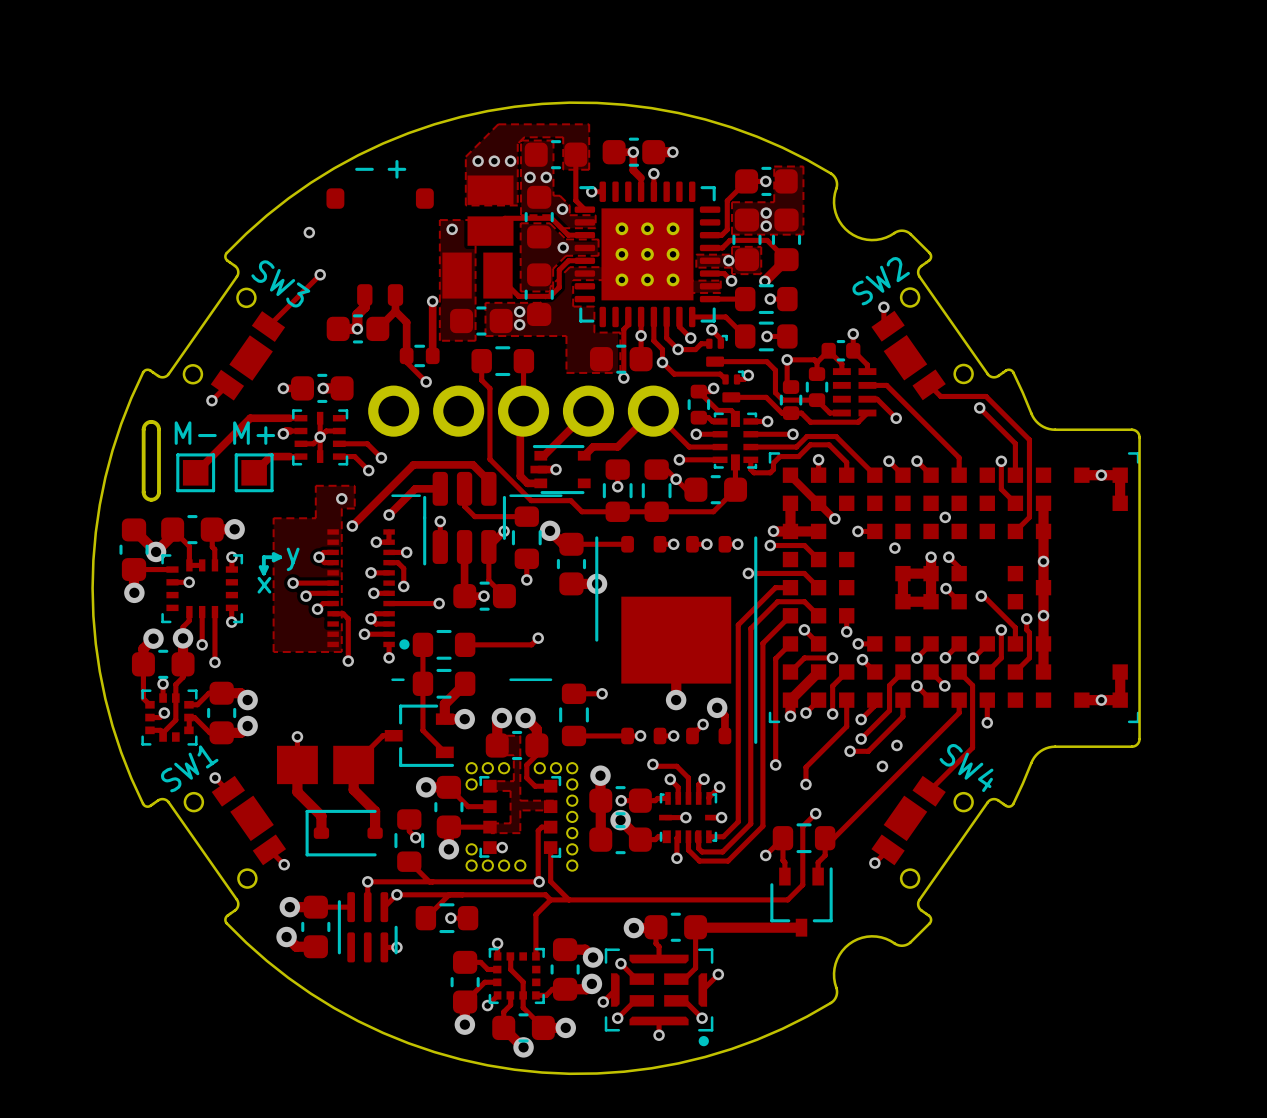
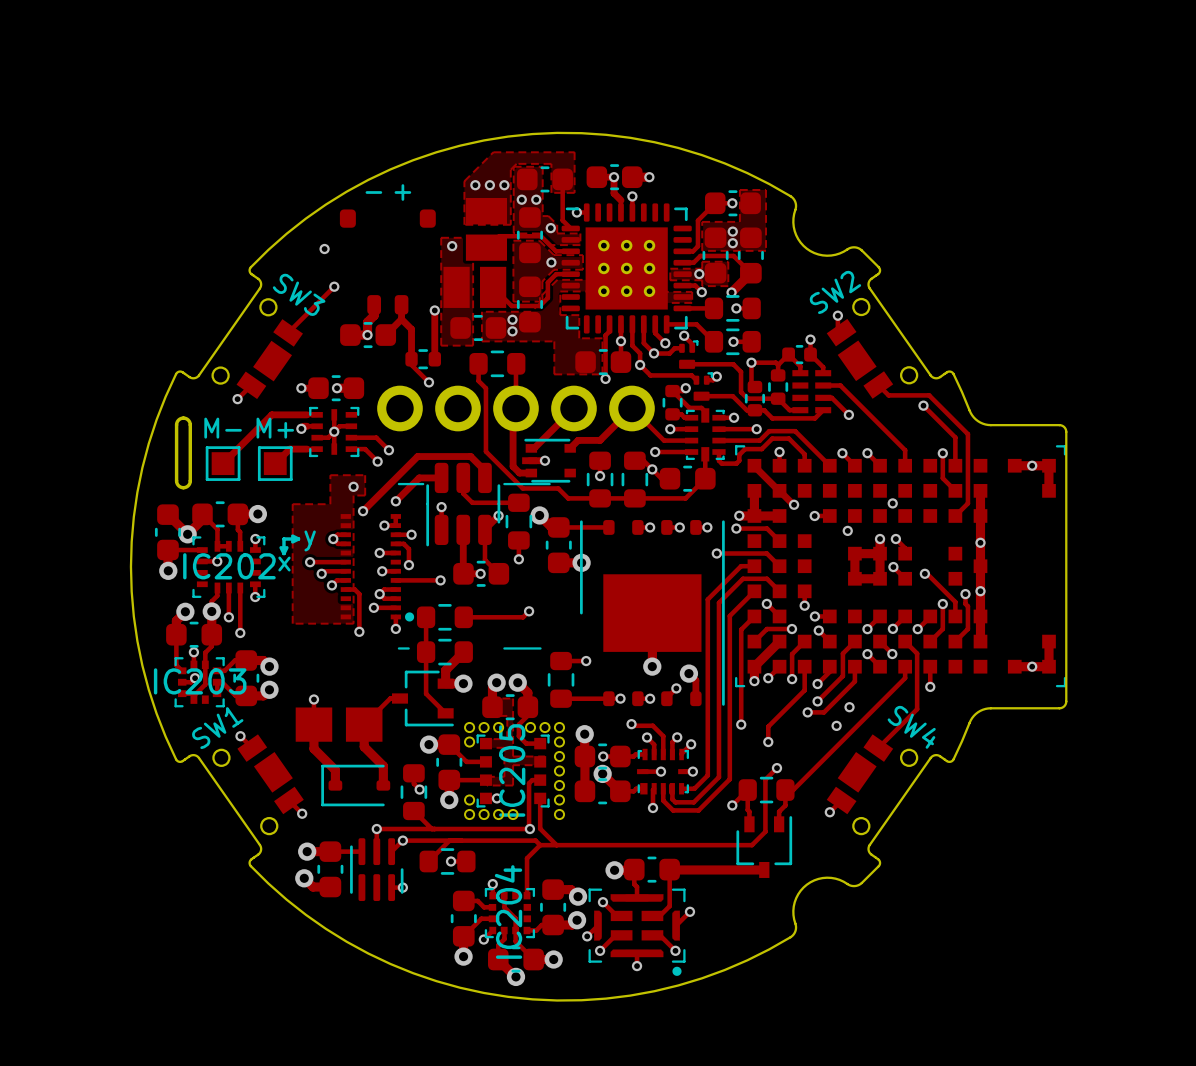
IC202 name: none -> IC202 (229, 566)
IC203 name: none -> IC203 (200, 681)
IC205 name: none -> IC205 (512, 770)
IC204 name: none -> IC204 (508, 912)

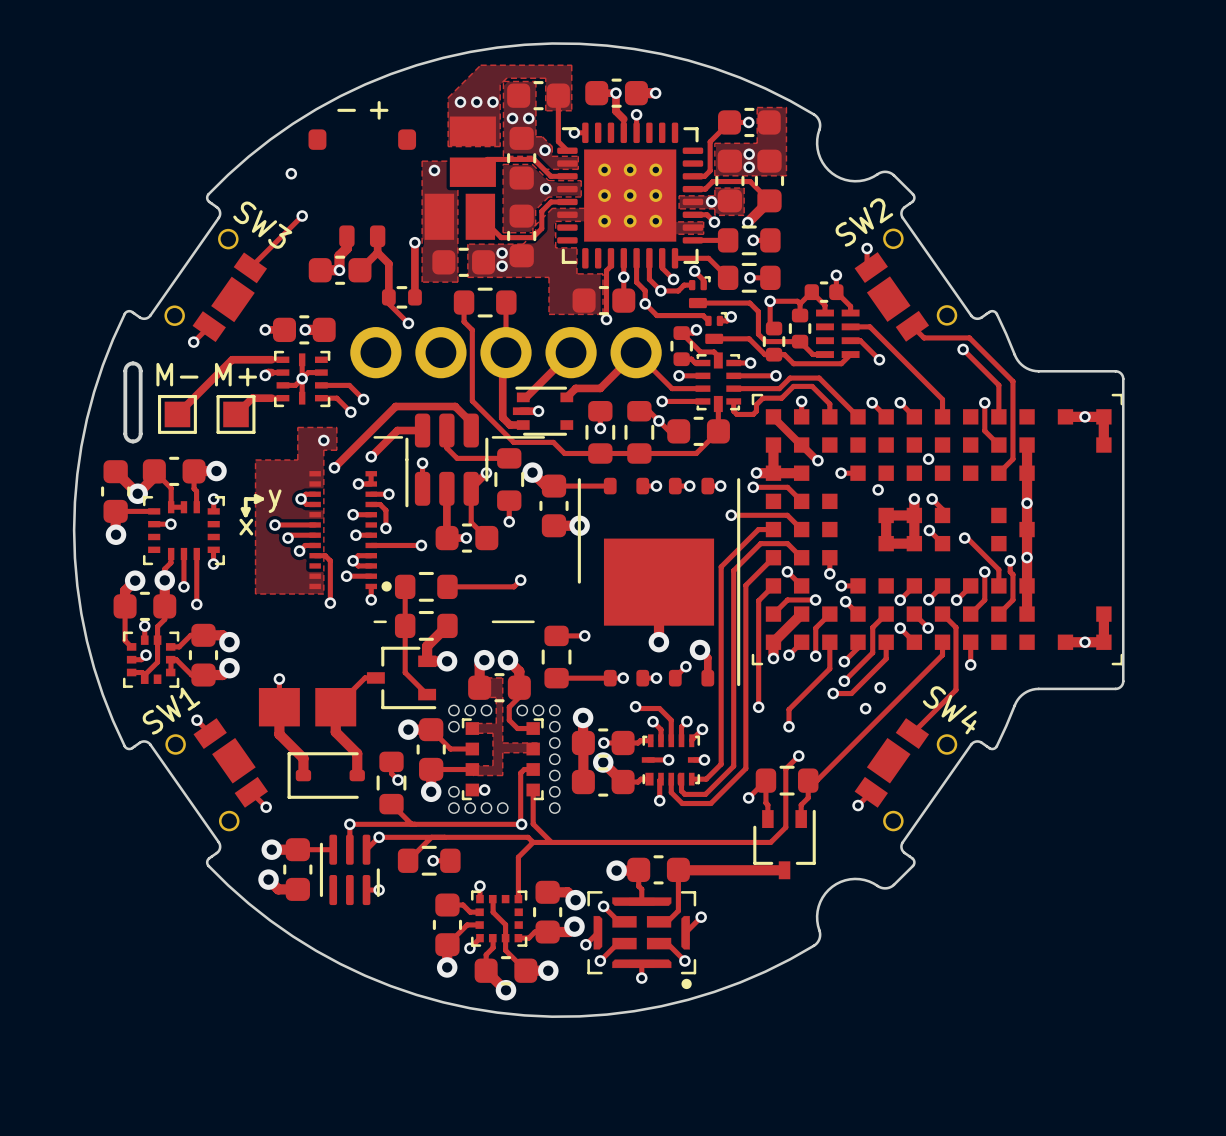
IC202 name: IC202 (229, 566) -> none
IC203 name: IC203 (200, 681) -> none
IC205 name: IC205 (512, 770) -> none
IC204 name: IC204 (508, 912) -> none

